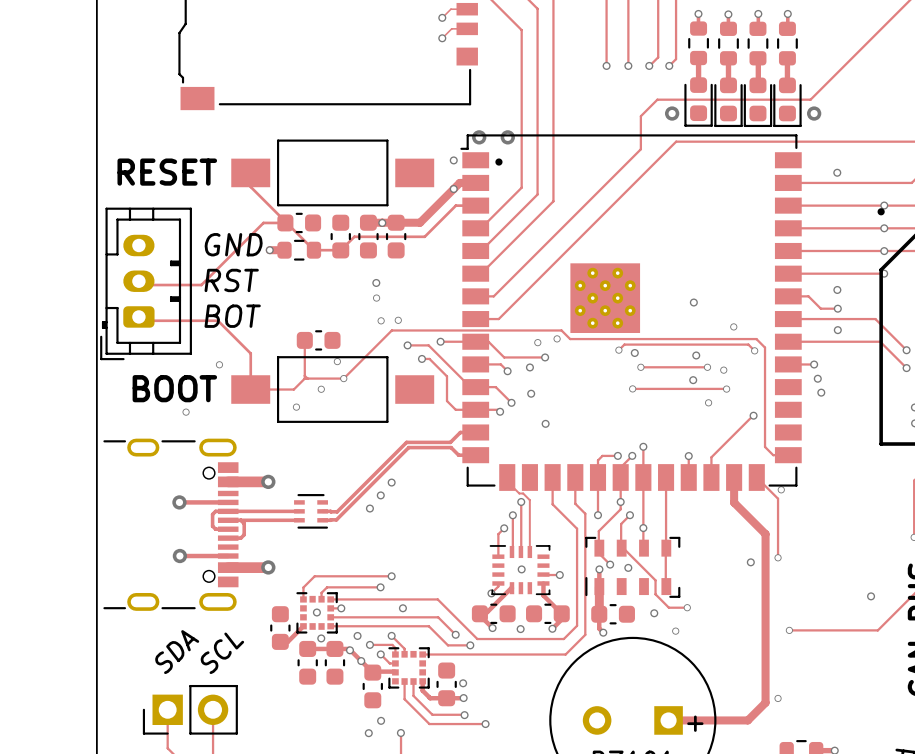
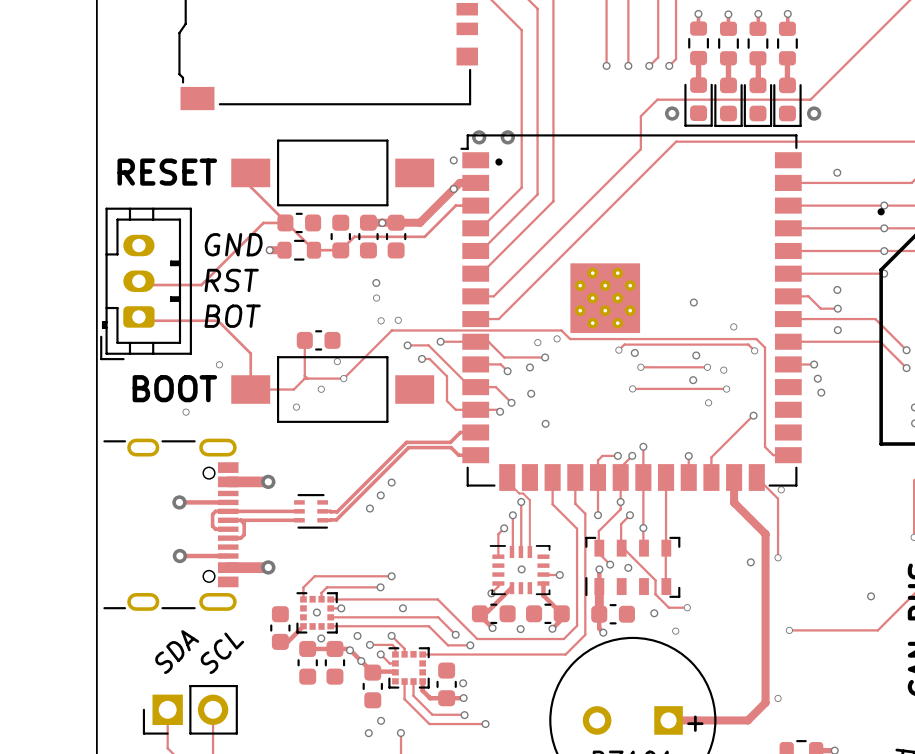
track: (467, 9) (450, 9) (442, 17) -> none
via: (442, 17) -> none
track: (467, 28) (451, 28) (442, 38) -> none
via: (442, 38) -> none

